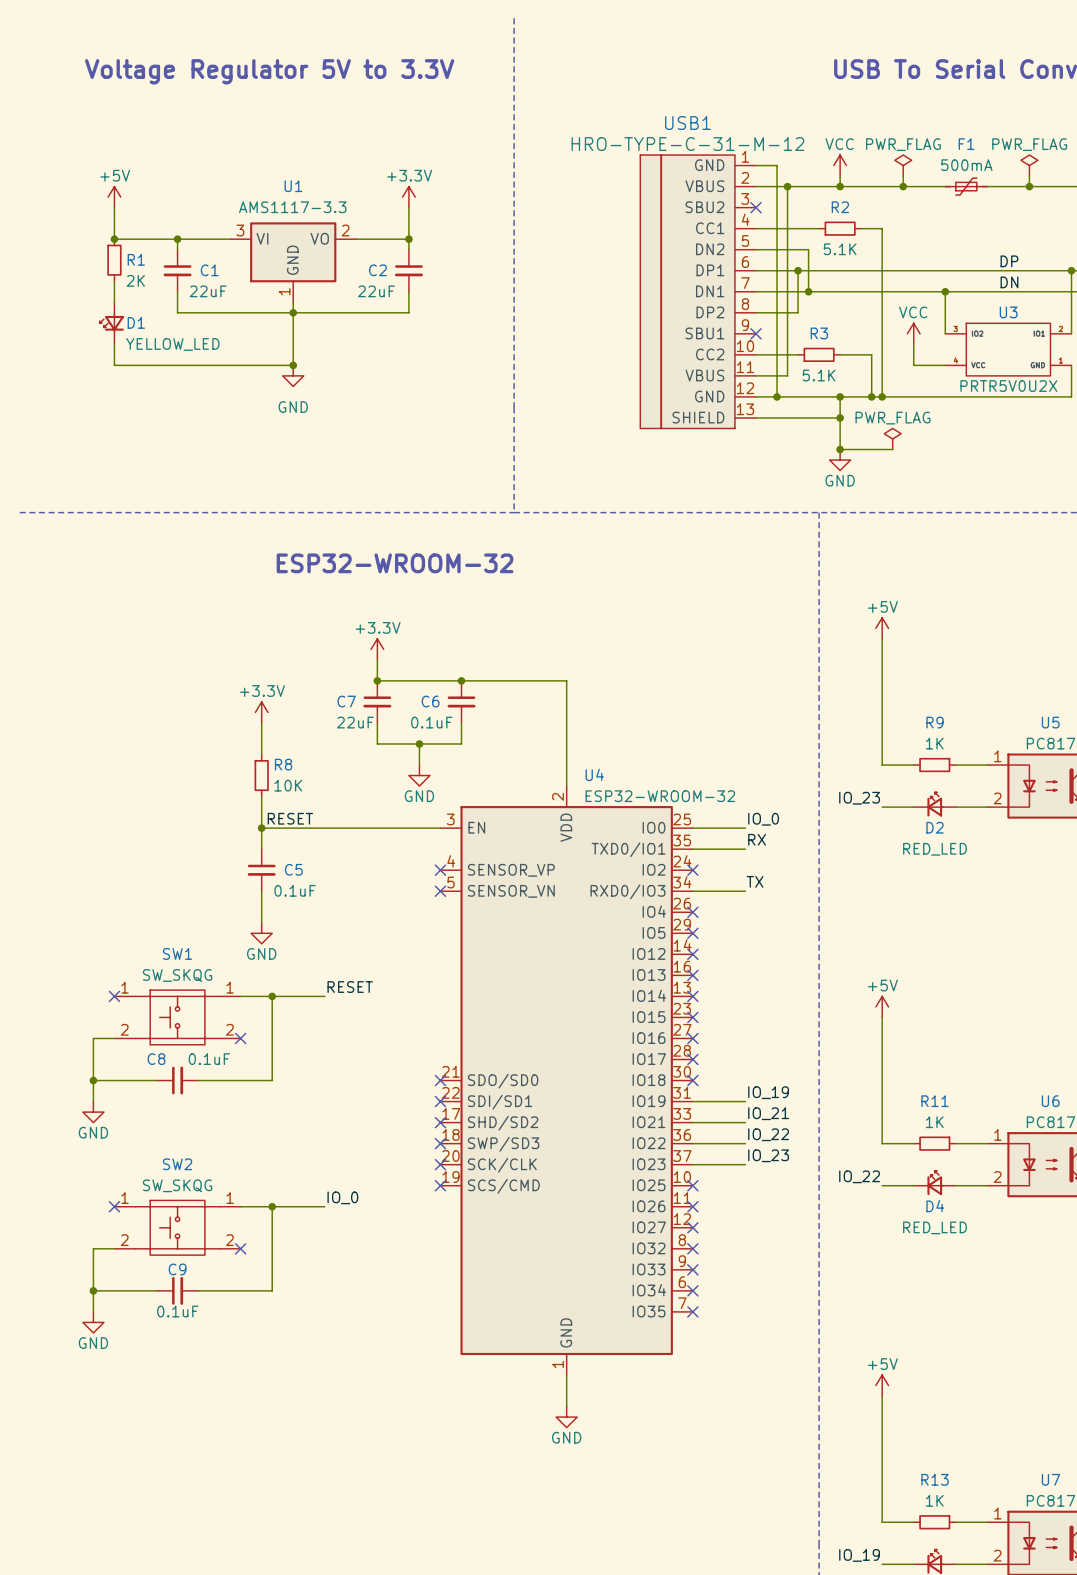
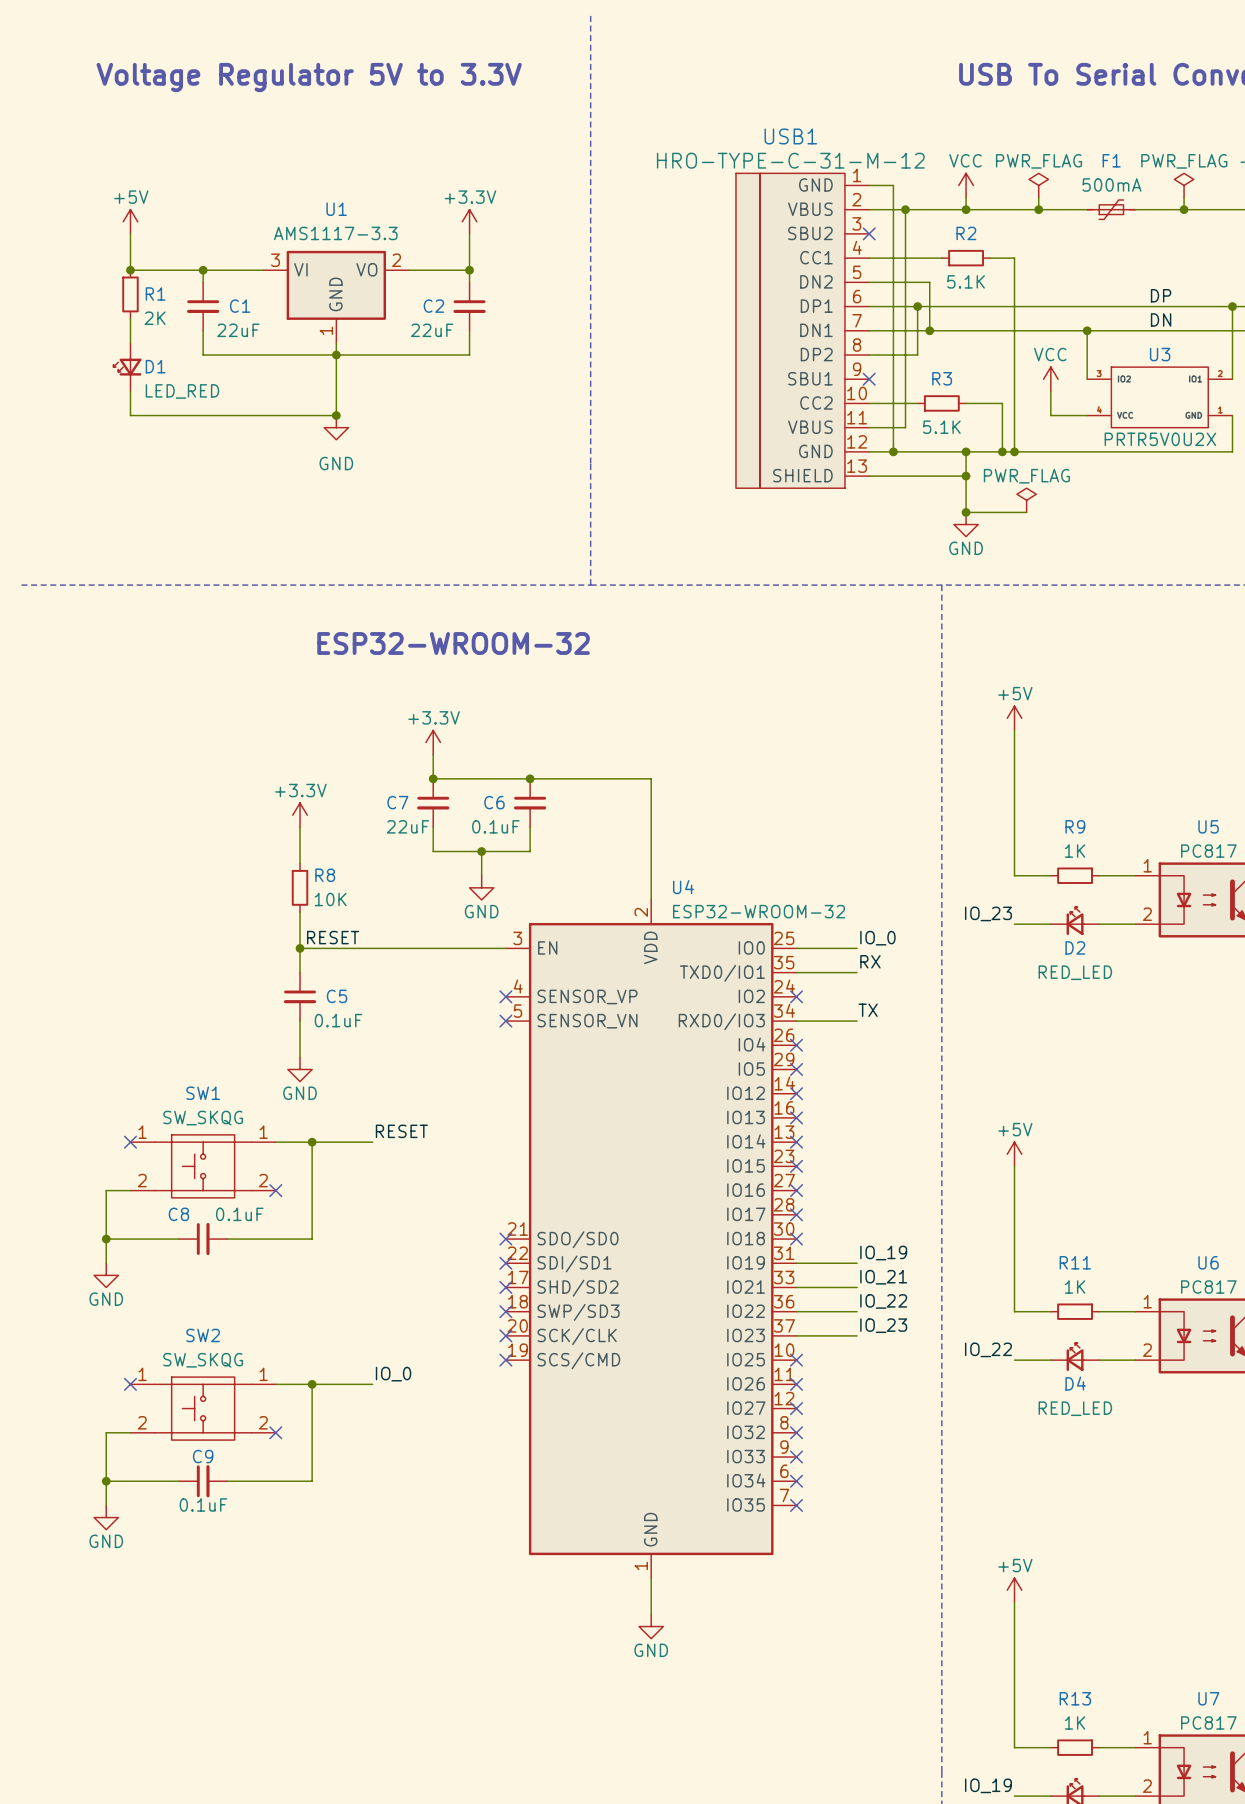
D1 value: YELLOW_LED (172, 344) -> LED_RED (182, 391)

